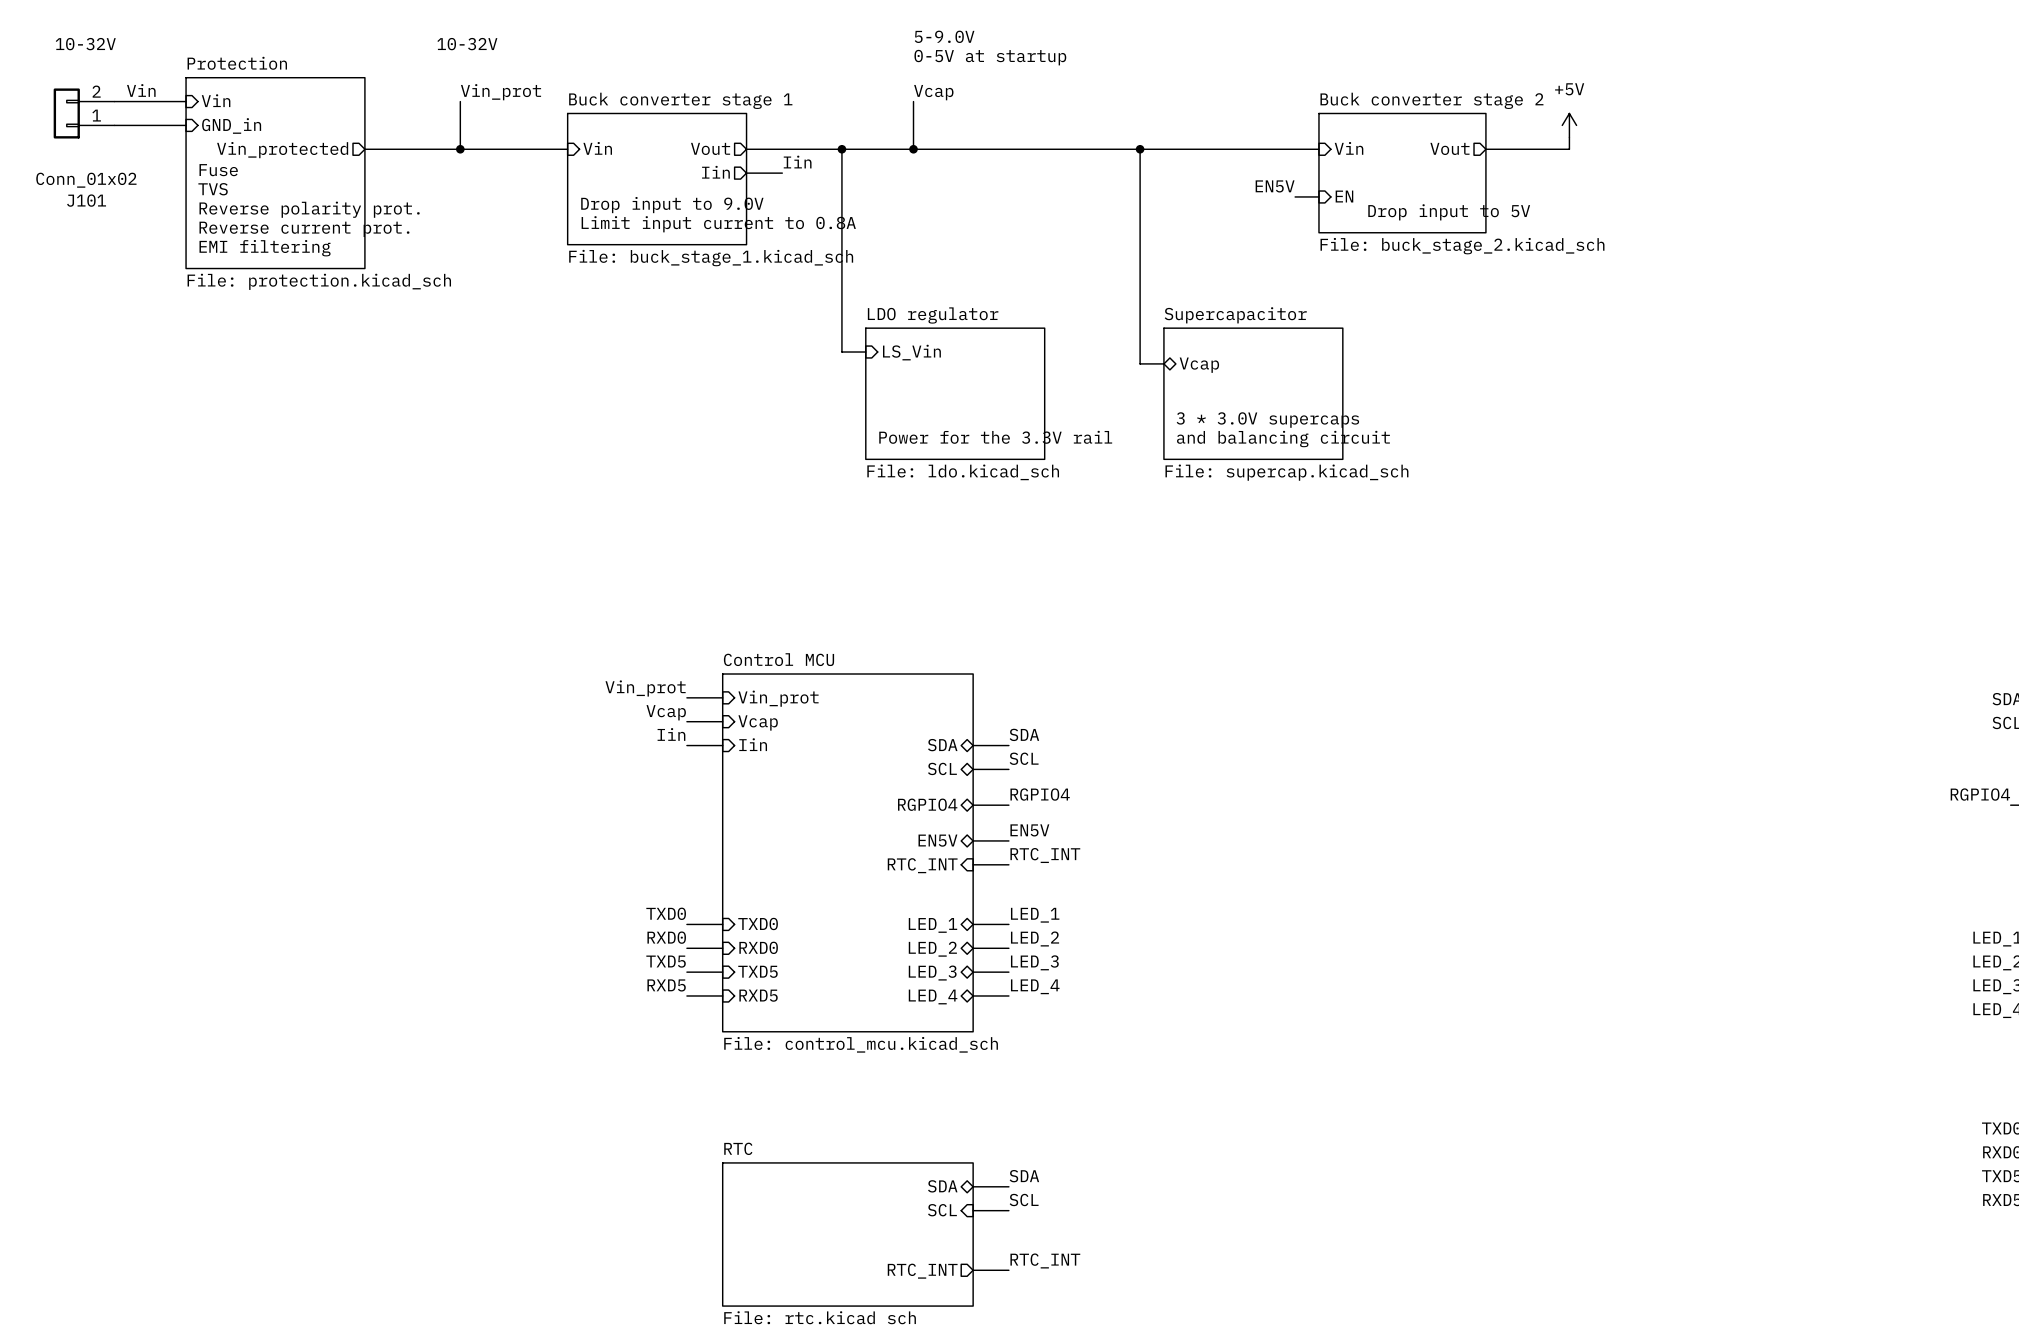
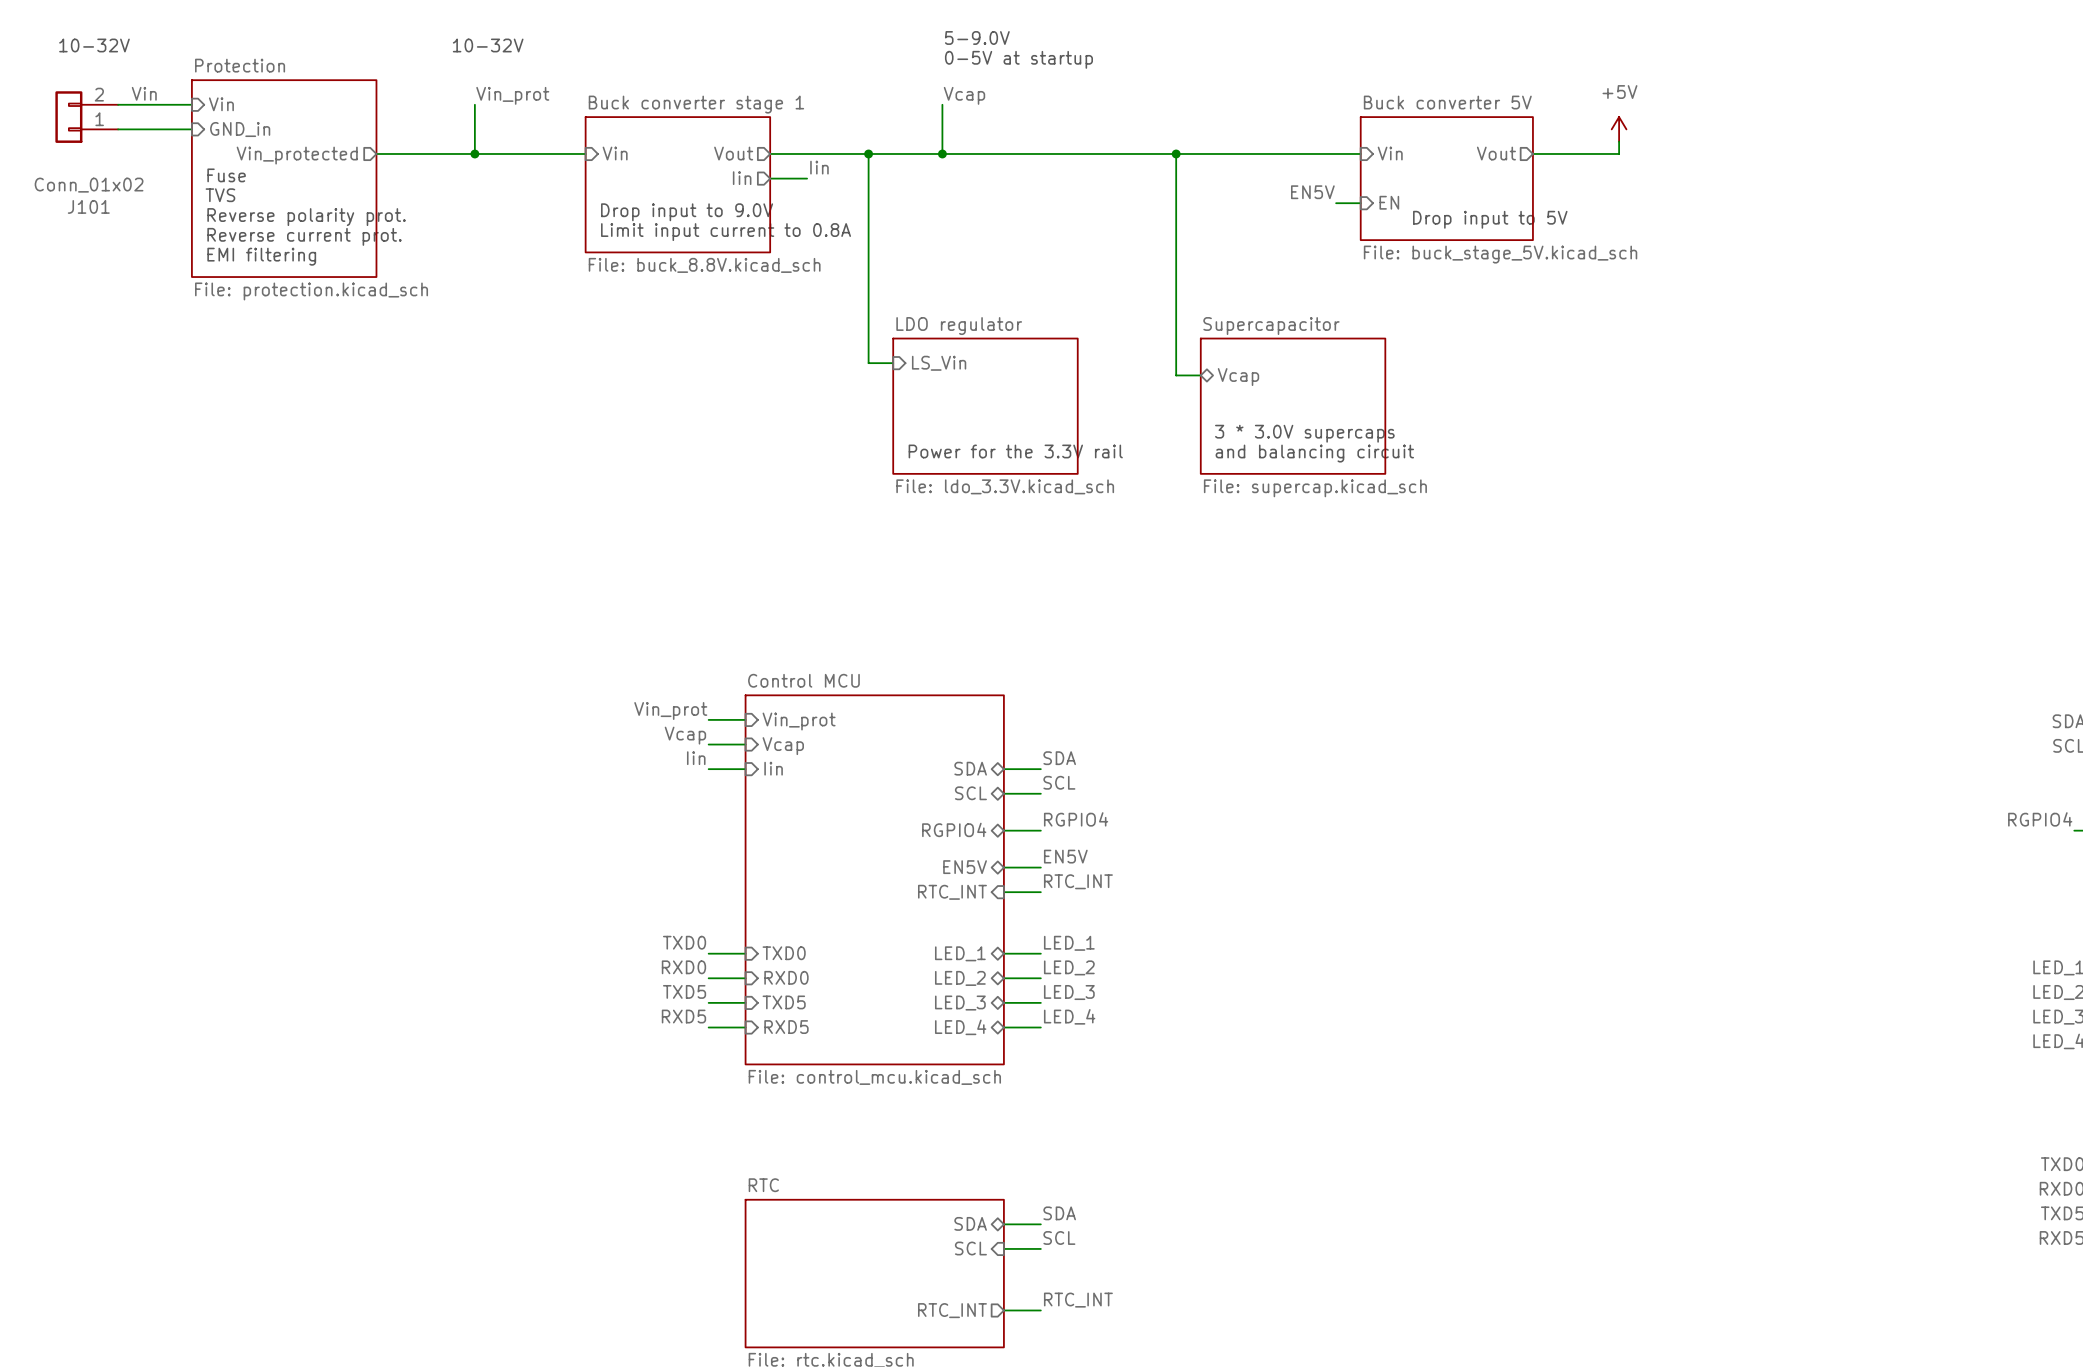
sheet Buck converter stage 2 name: Buck converter stage 2 (1431, 100) -> Buck converter 5V (1447, 102)
sheet Buck converter stage 2 value: File: buck_stage_2.kicad_sch (1462, 246) -> File: buck_stage_5V.kicad_sch (1500, 254)
sheet Buck converter stage 1 value: File: buck_stage_1.kicad_sch (711, 258) -> File: buck_8.8V.kicad_sch (704, 265)
sheet LDO regulator value: File: ldo.kicad_sch (963, 472) -> File: ldo_3.3V.kicad_sch (1005, 486)

